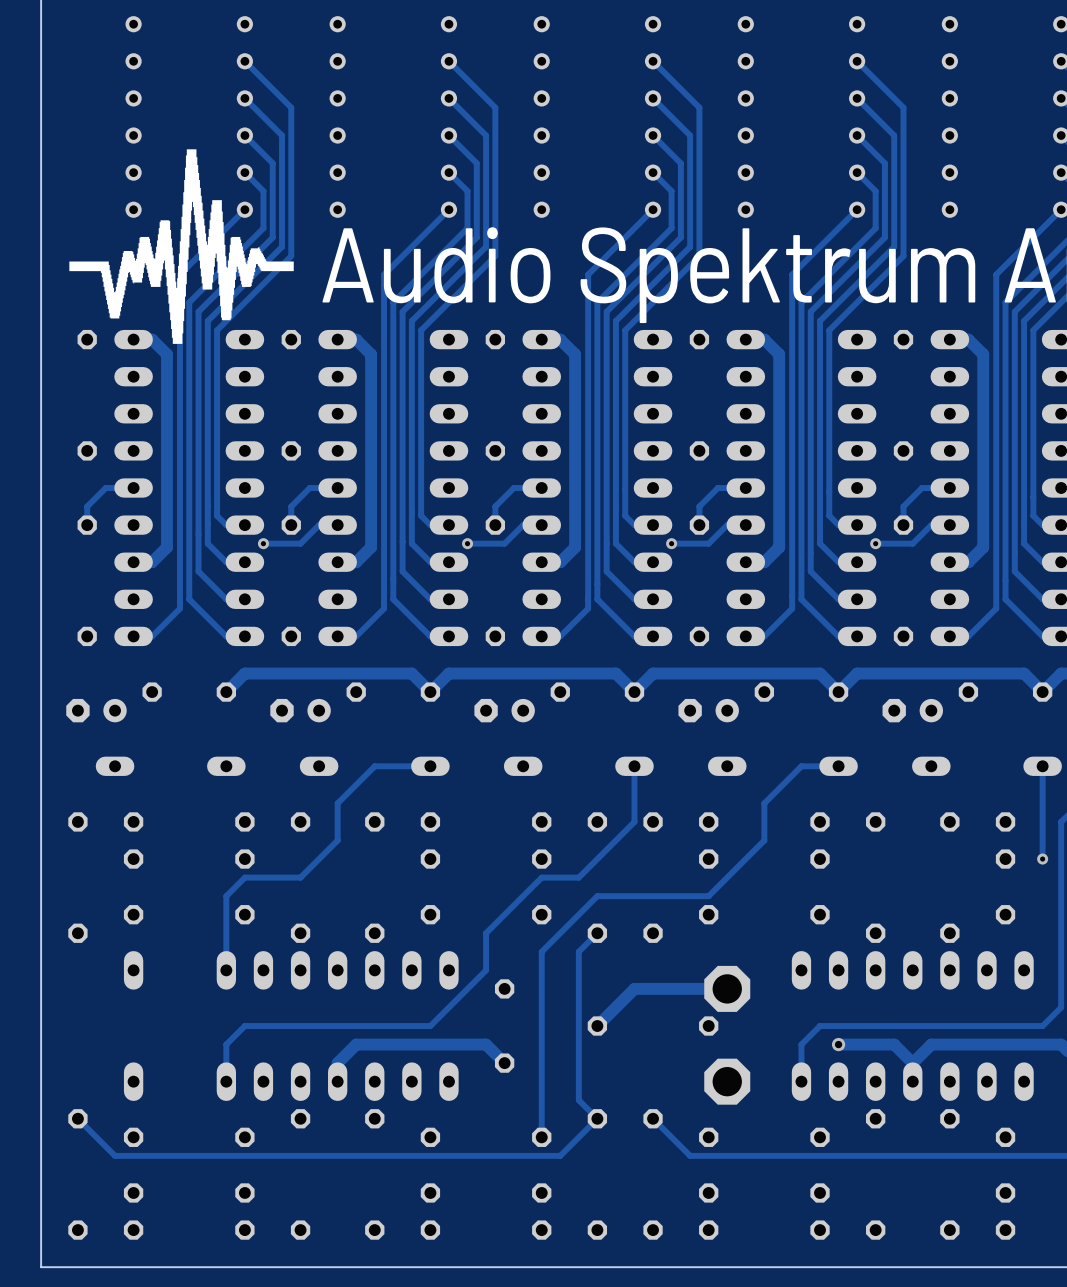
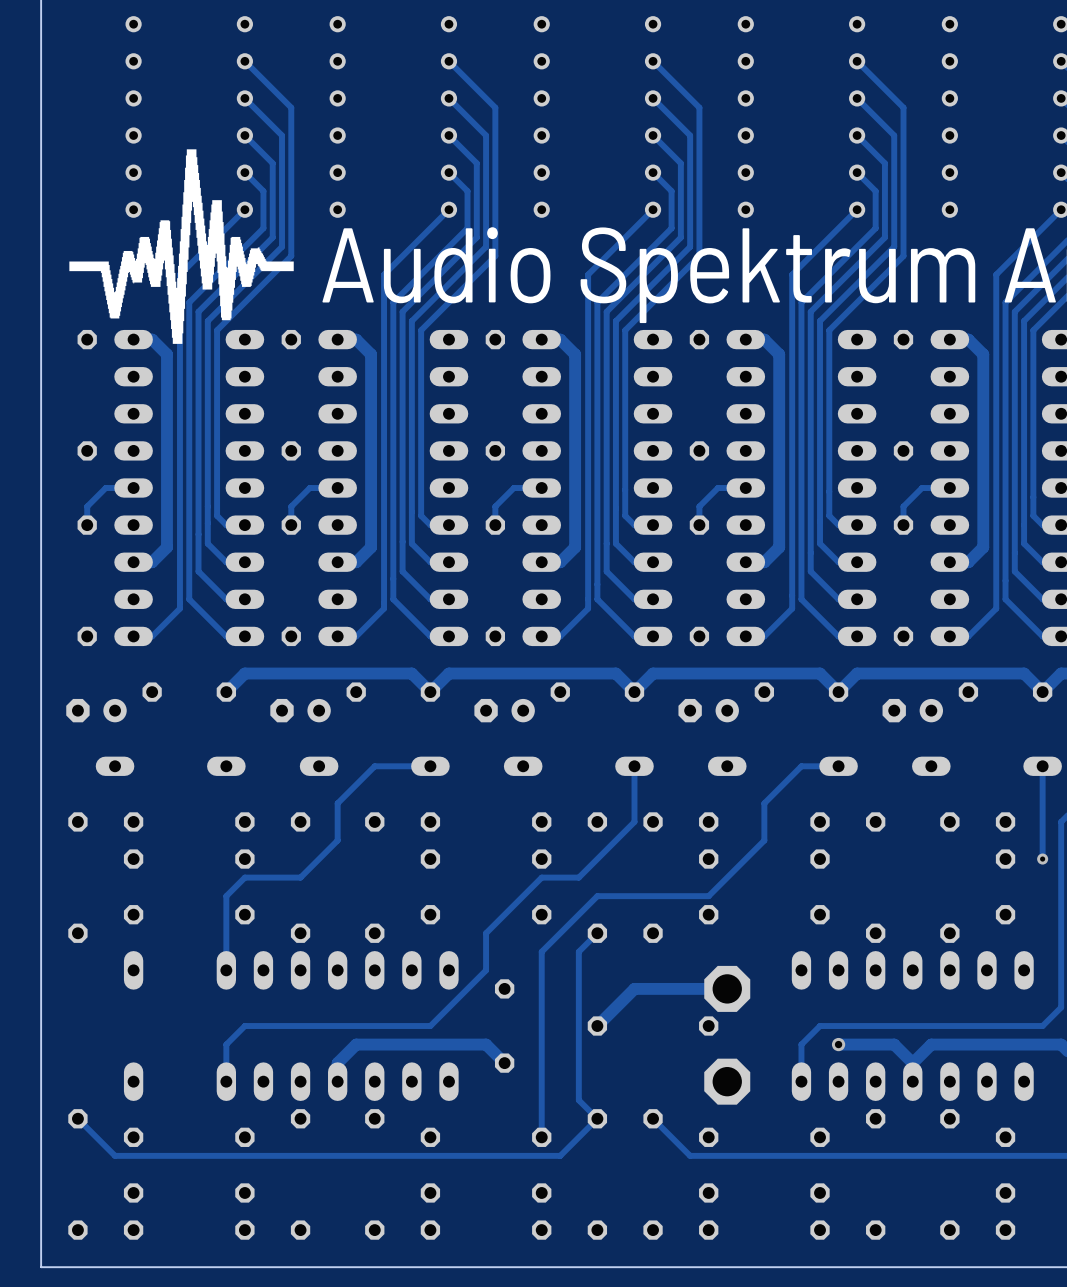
track: (337, 525) (319, 525) (300, 543) (263, 543) -> none
track: (541, 525) (523, 525) (504, 543) (467, 543) -> none
track: (745, 525) (727, 525) (708, 543) (671, 543) -> none
track: (949, 525) (931, 525) (912, 543) (875, 543) -> none
via: (263, 543) -> none
via: (467, 543) -> none
via: (671, 543) -> none
via: (875, 543) -> none

